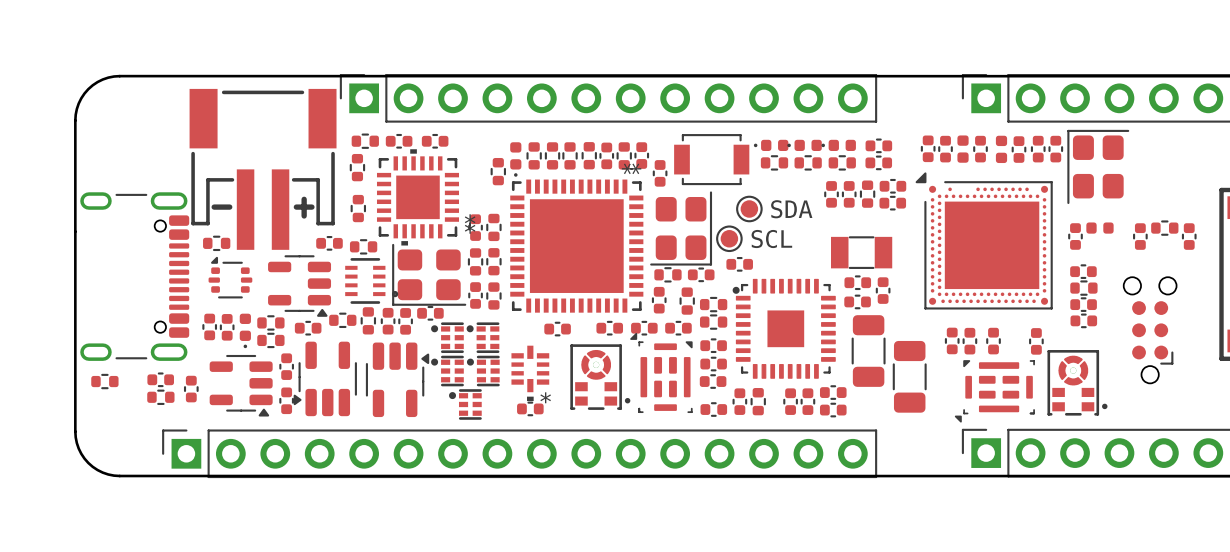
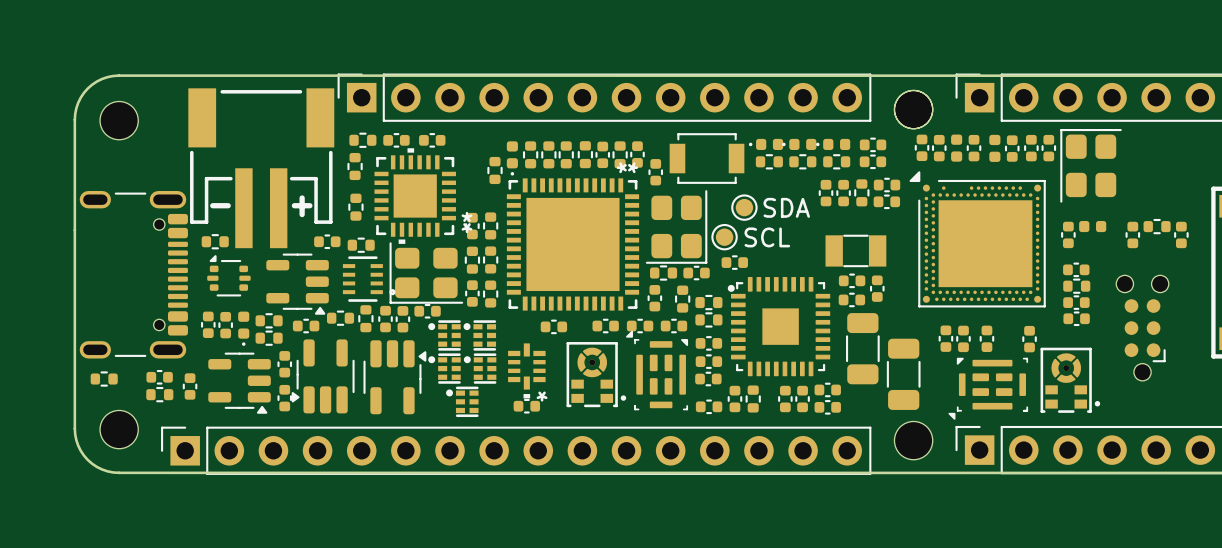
part: none -> (913, 109)
part: none -> (119, 120)
part: none -> (119, 429)
part: none -> (913, 440)

